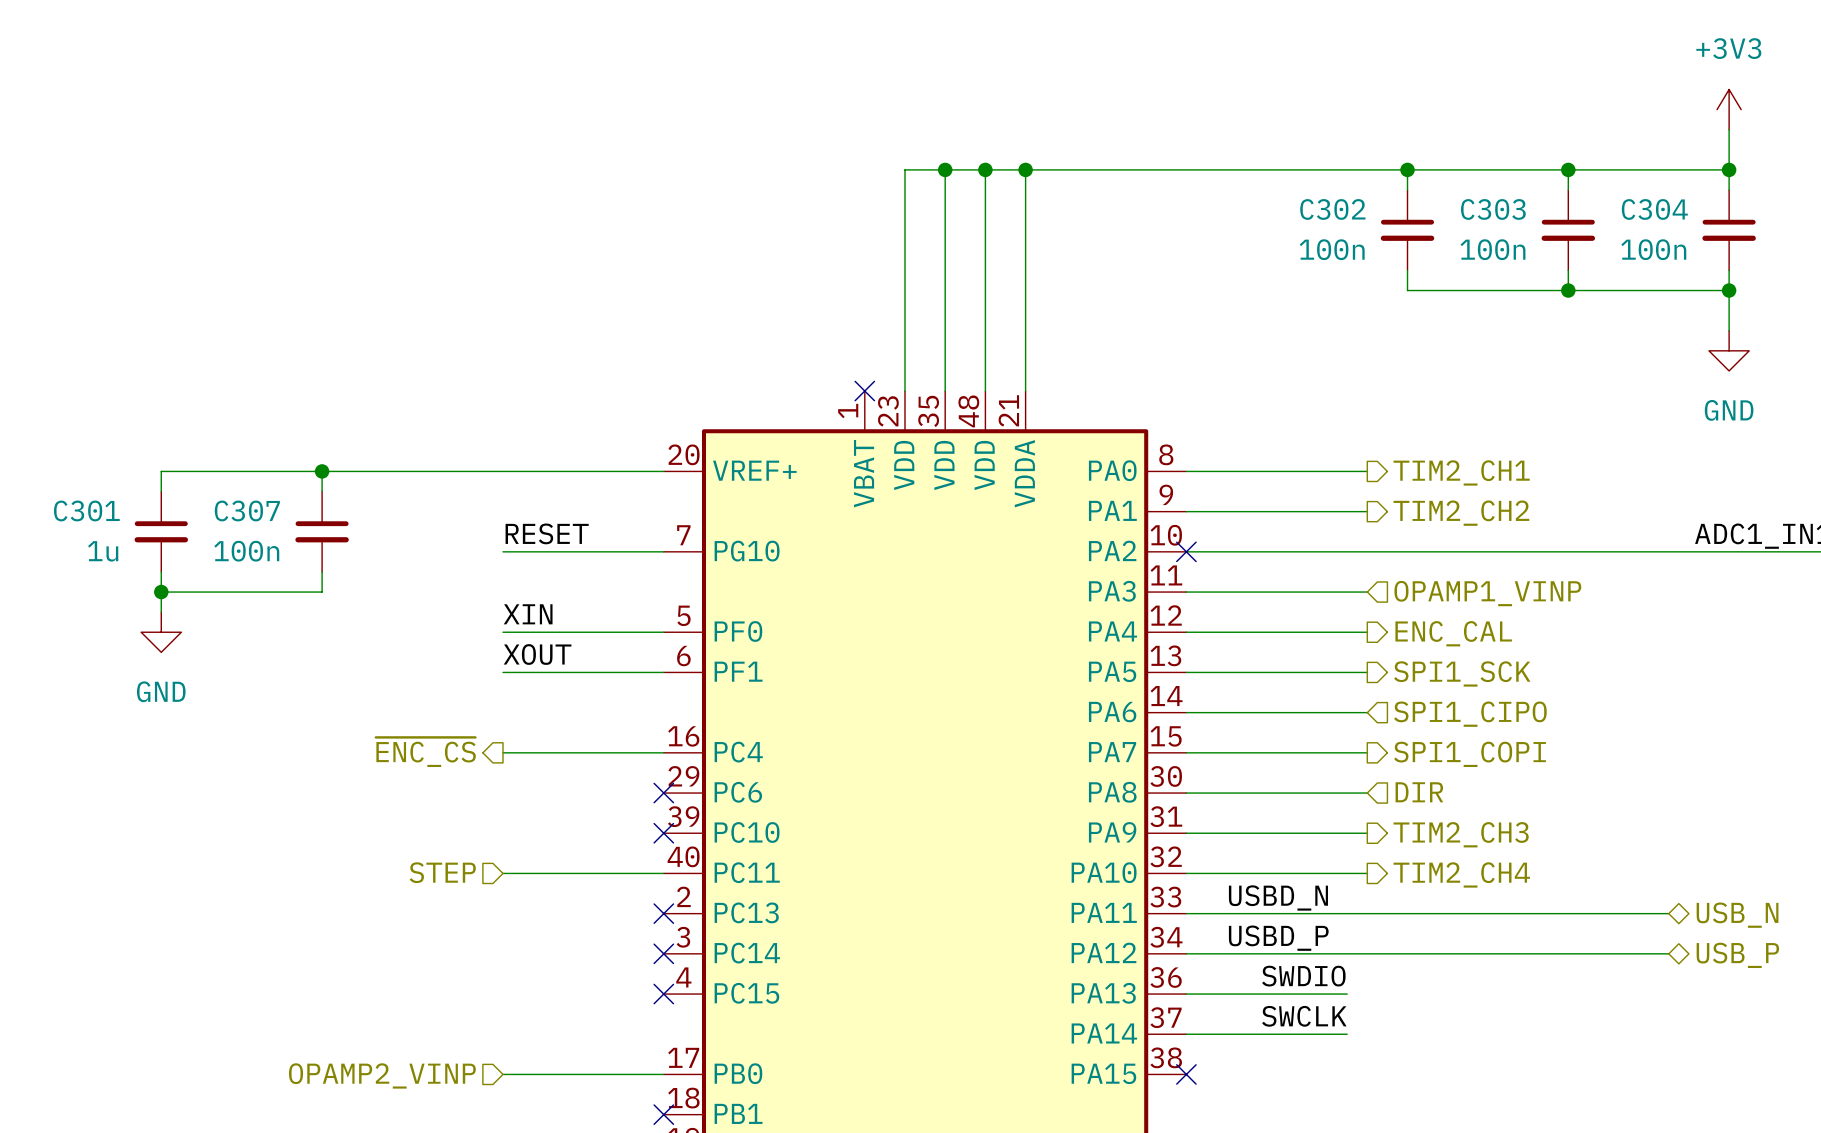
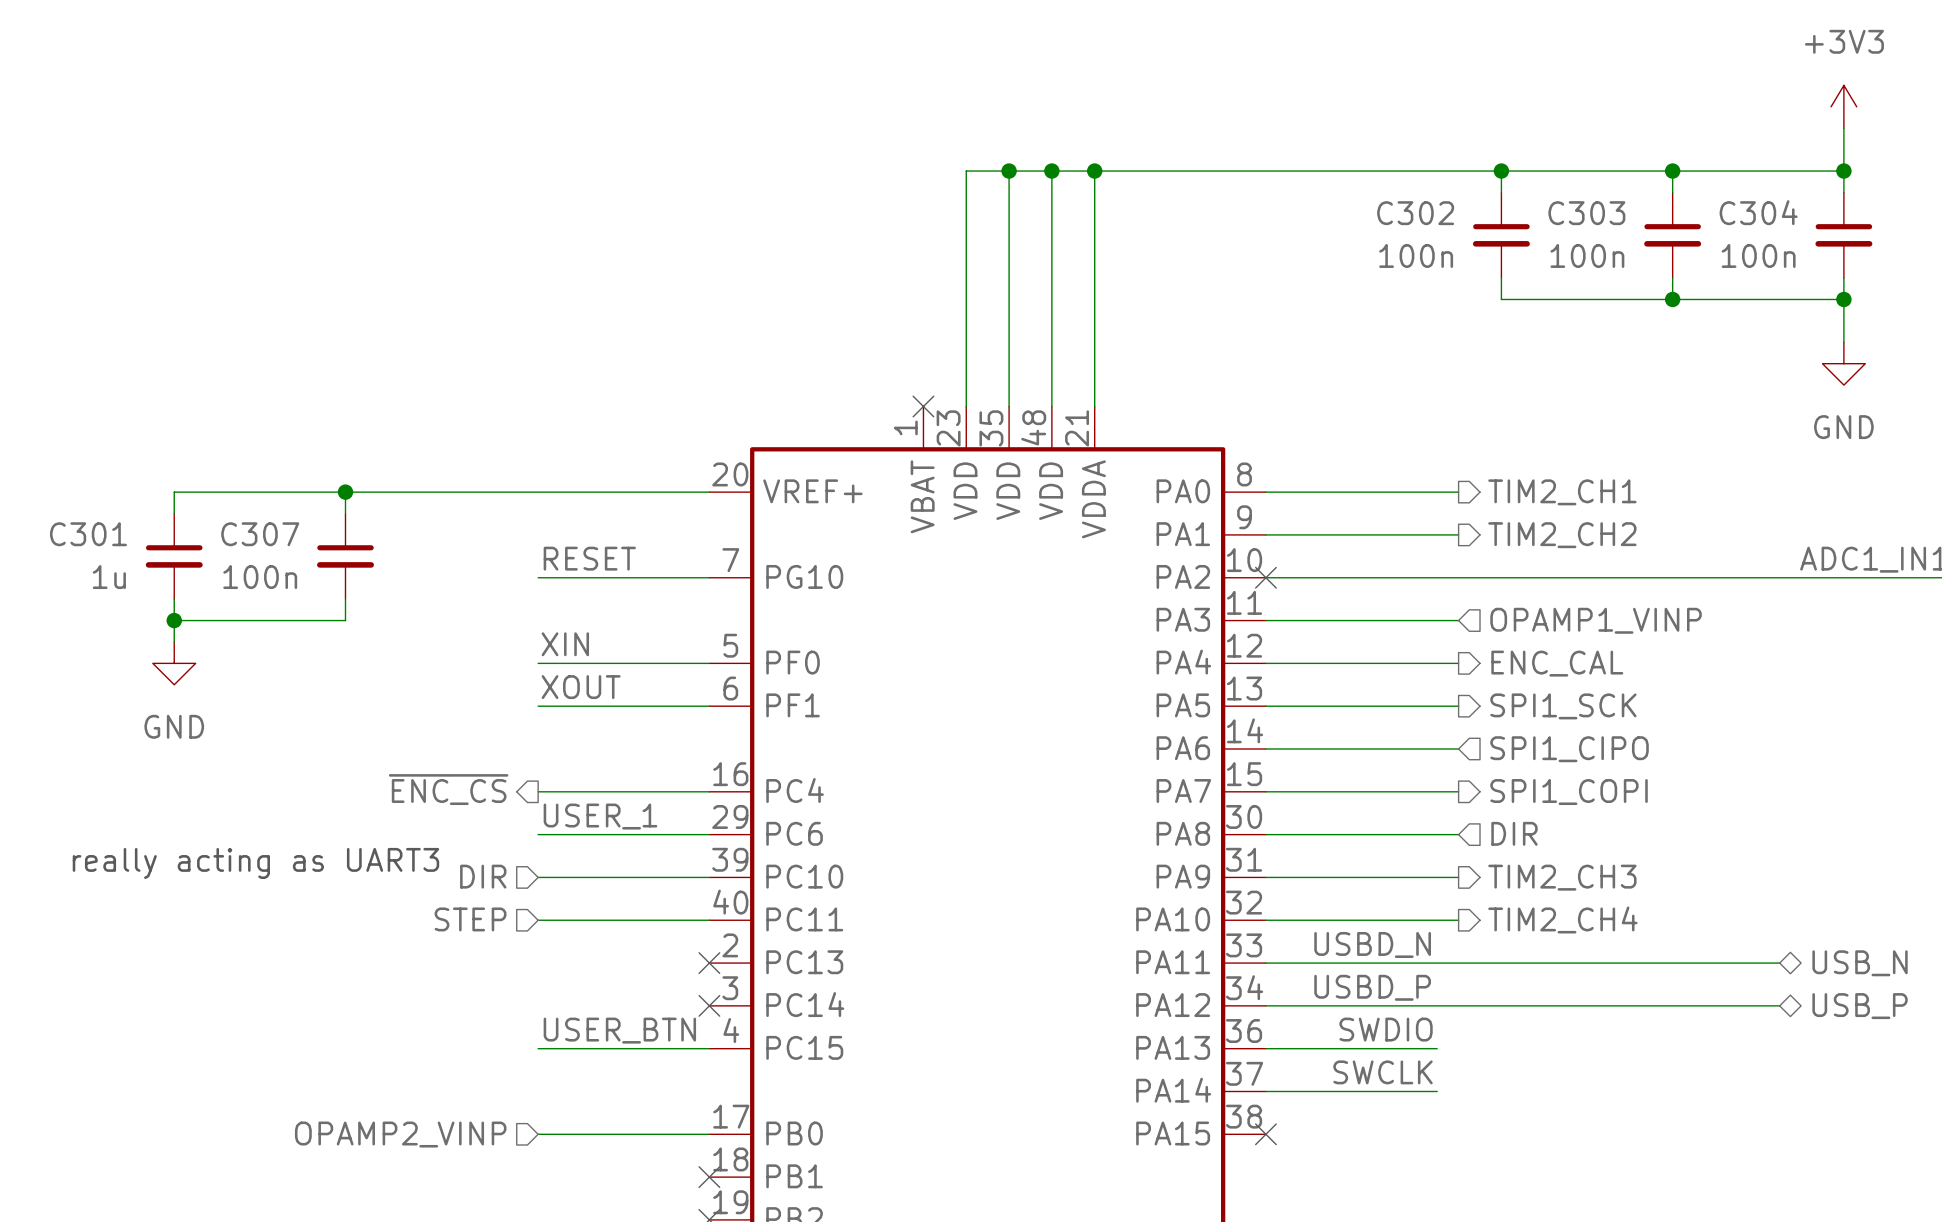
label: none -> USER_1 (600, 816)
wire: none -> (538, 834) (709, 834)
no-connect mark: (663, 793) -> none
text: none -> really acting as UART3 (255, 863)
hierarchical label: none -> DIR (483, 876)
wire: none -> (538, 877) (709, 877)
no-connect mark: (663, 833) -> none
label: none -> USER_BTN (619, 1030)
wire: none -> (538, 1048) (709, 1048)
no-connect mark: (663, 994) -> none

